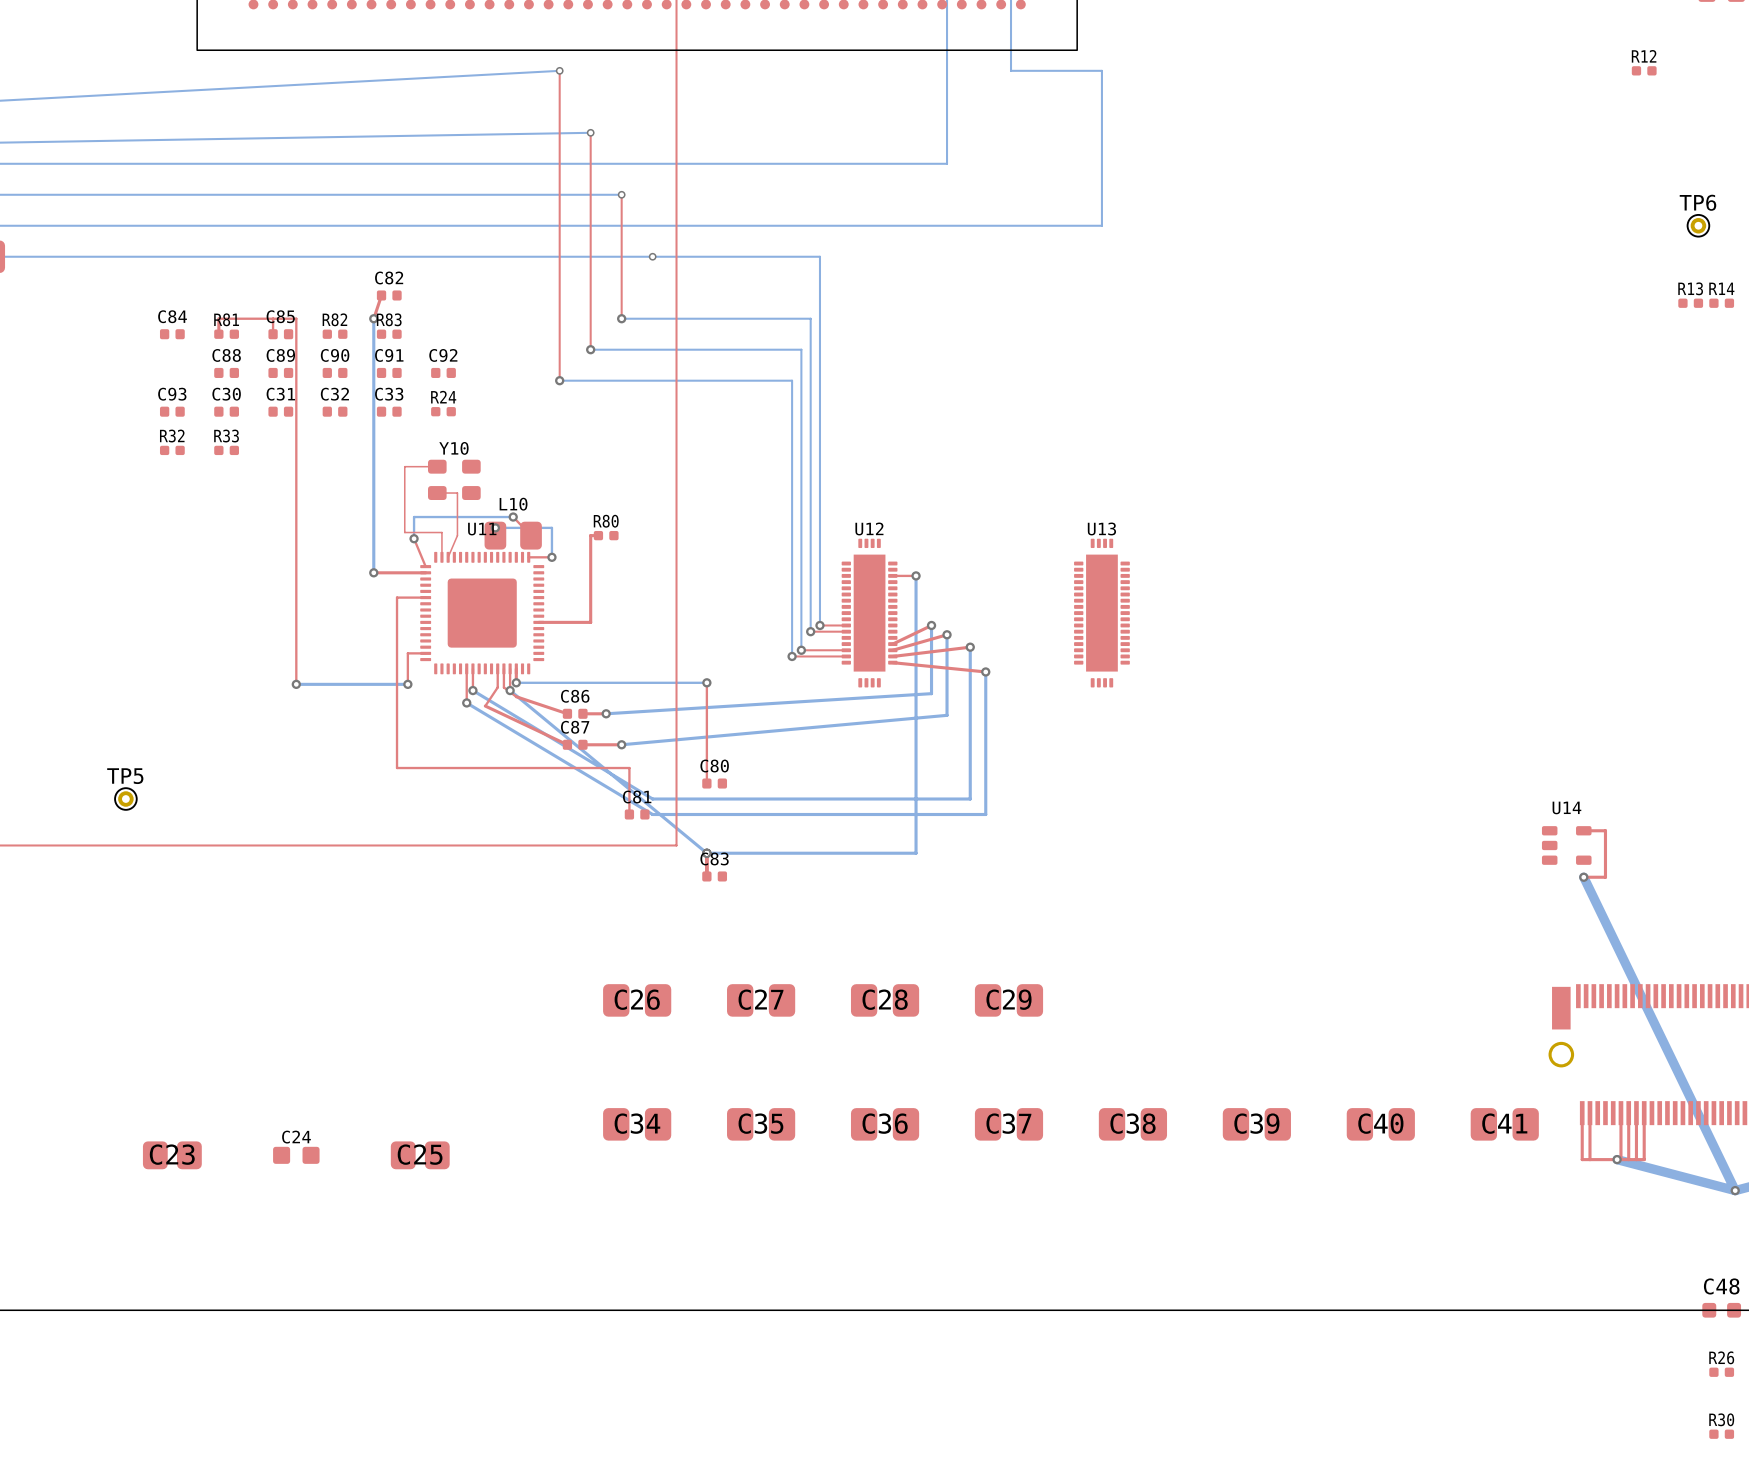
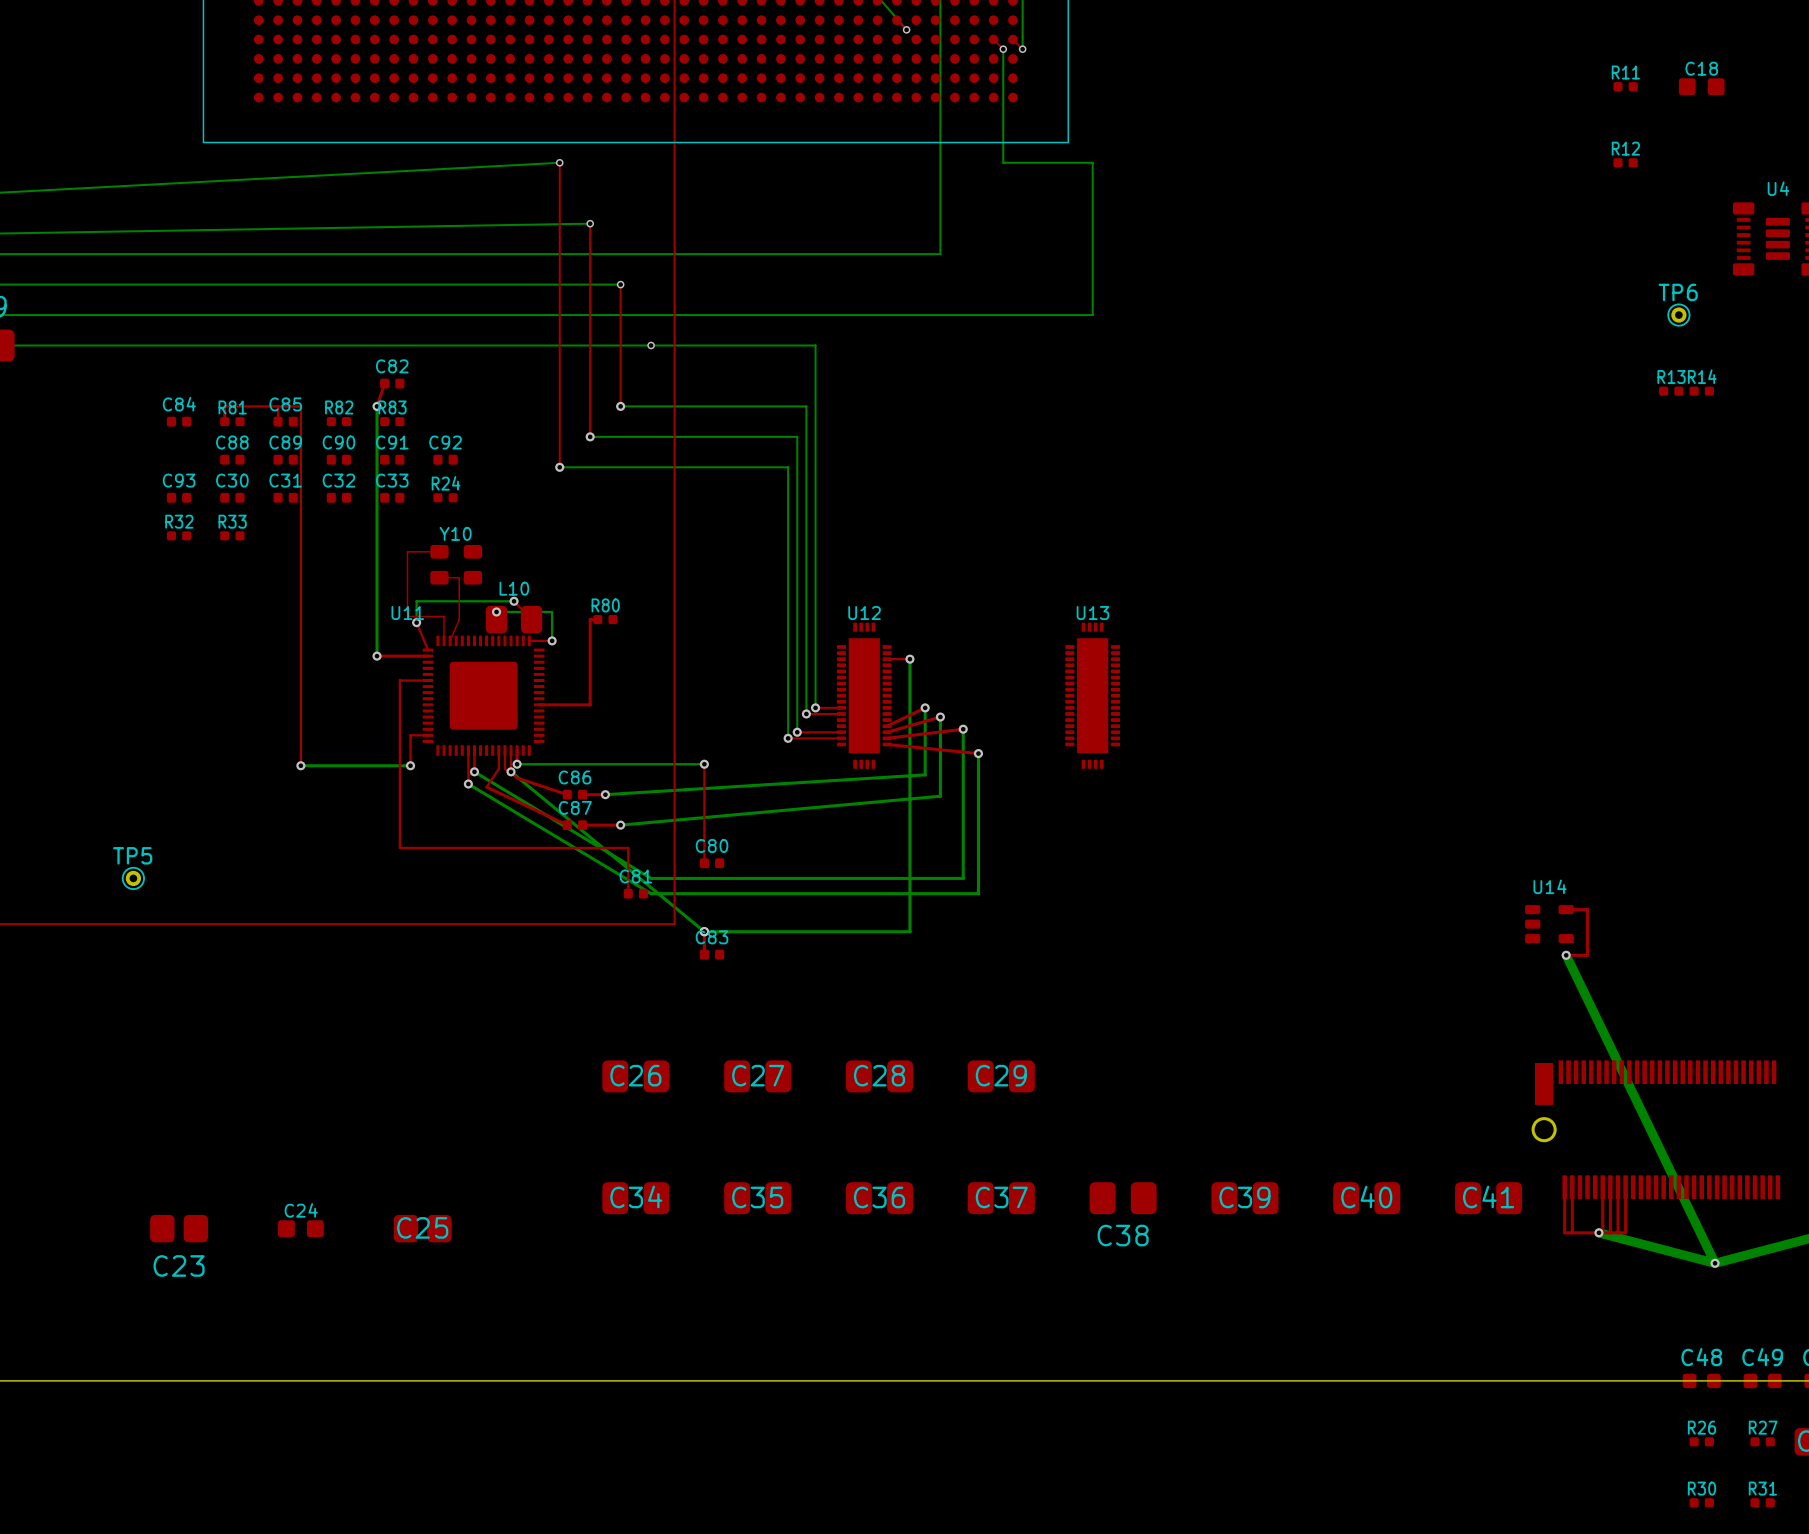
U11 name position: U11 (482, 529) -> U11 (407, 613)
C38 name position: C38 (1132, 1123) -> C38 (1123, 1235)
C23 name position: C23 (172, 1154) -> C23 (179, 1265)

